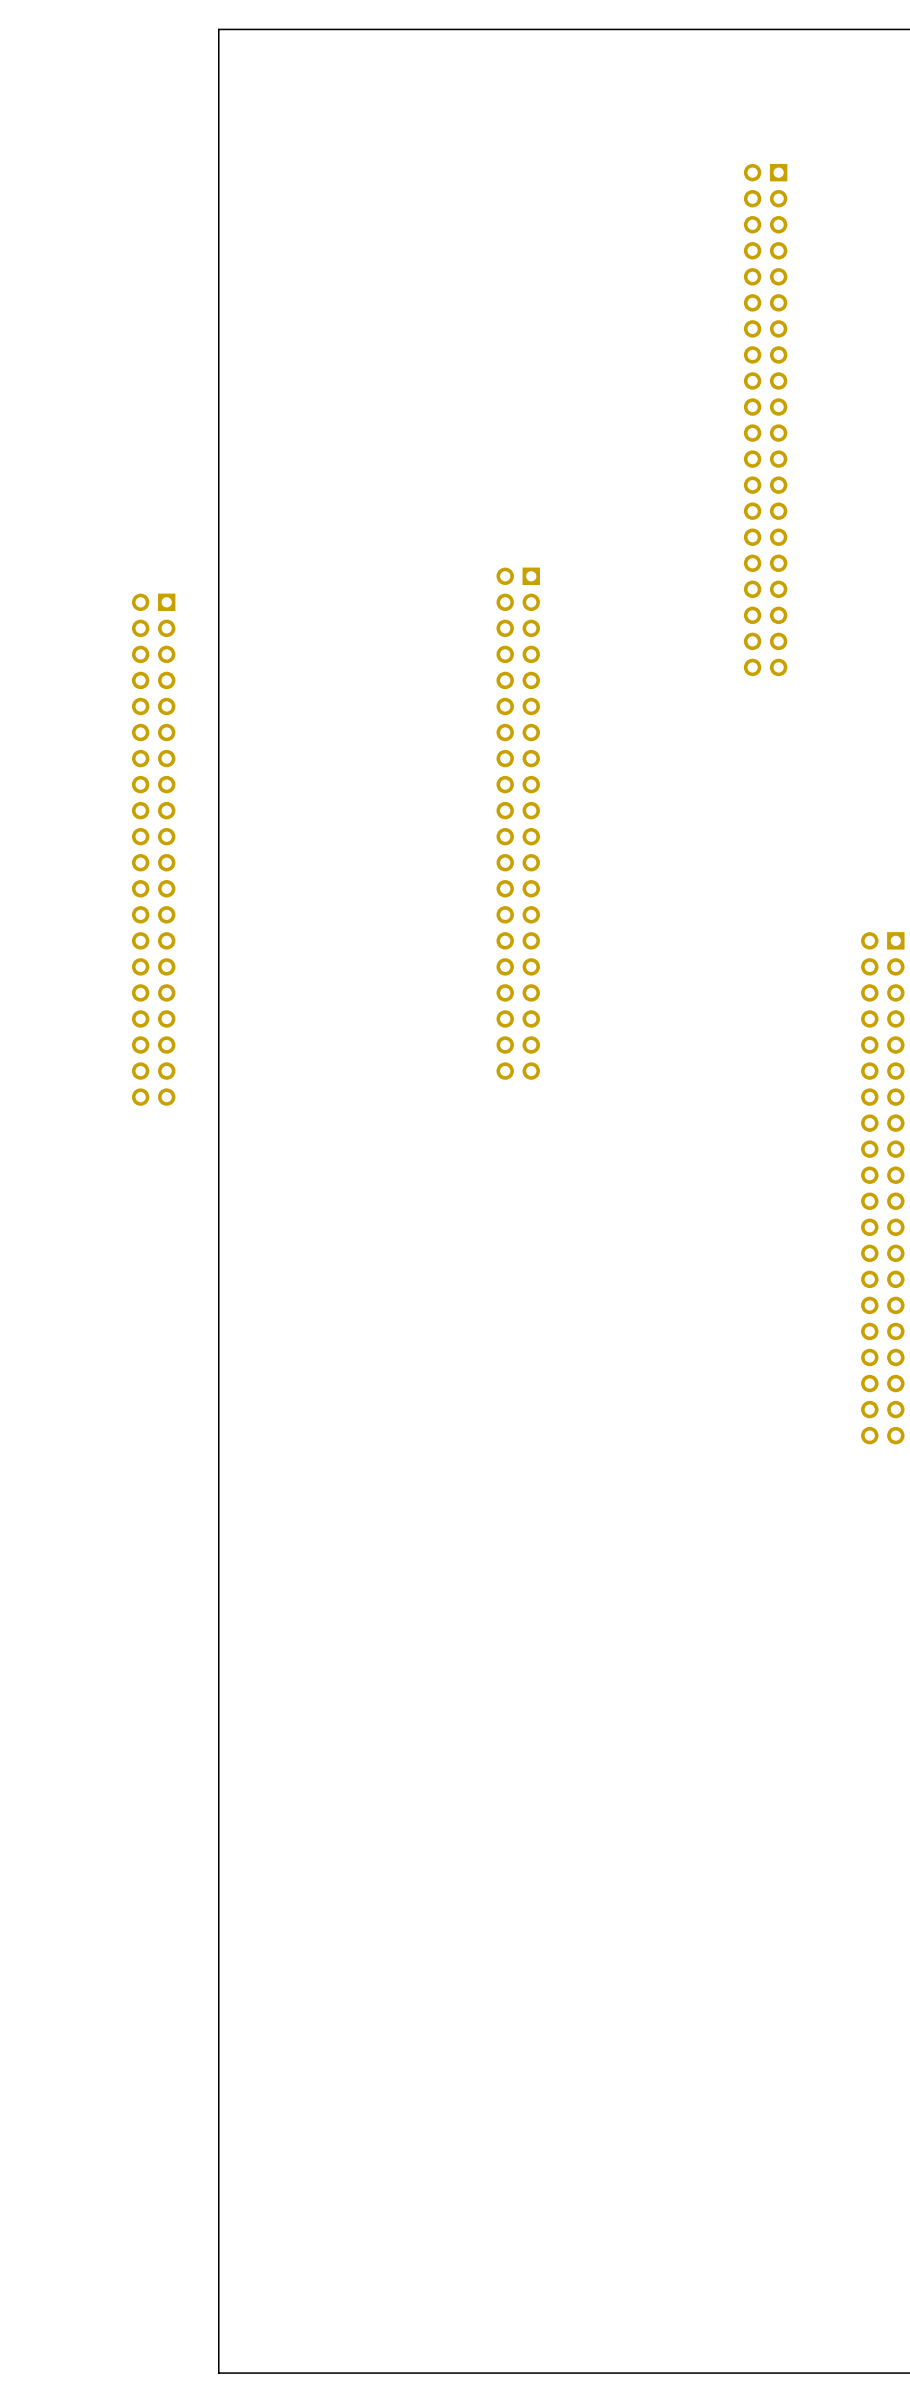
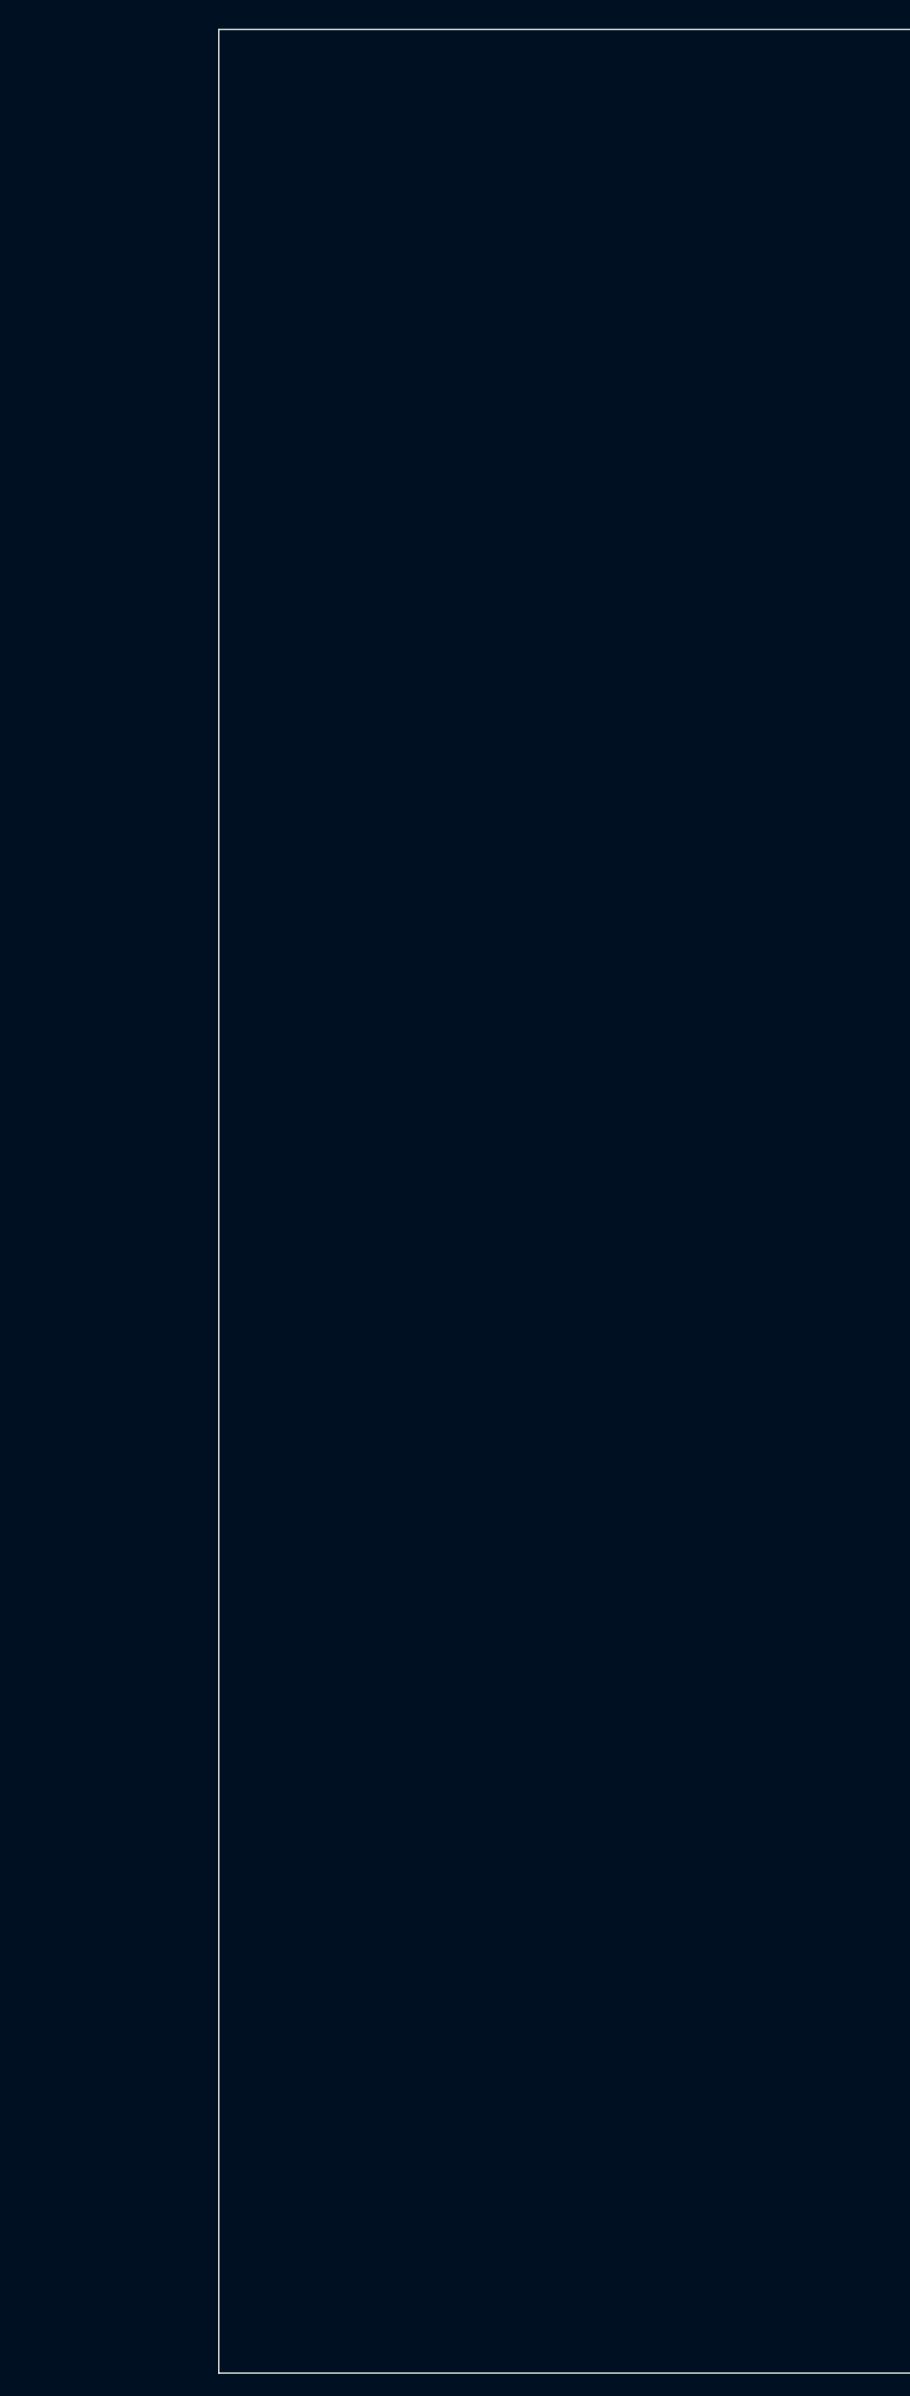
part: (765, 420) -> none
part: (518, 823) -> none
part: (153, 849) -> none
part: (882, 1188) -> none

